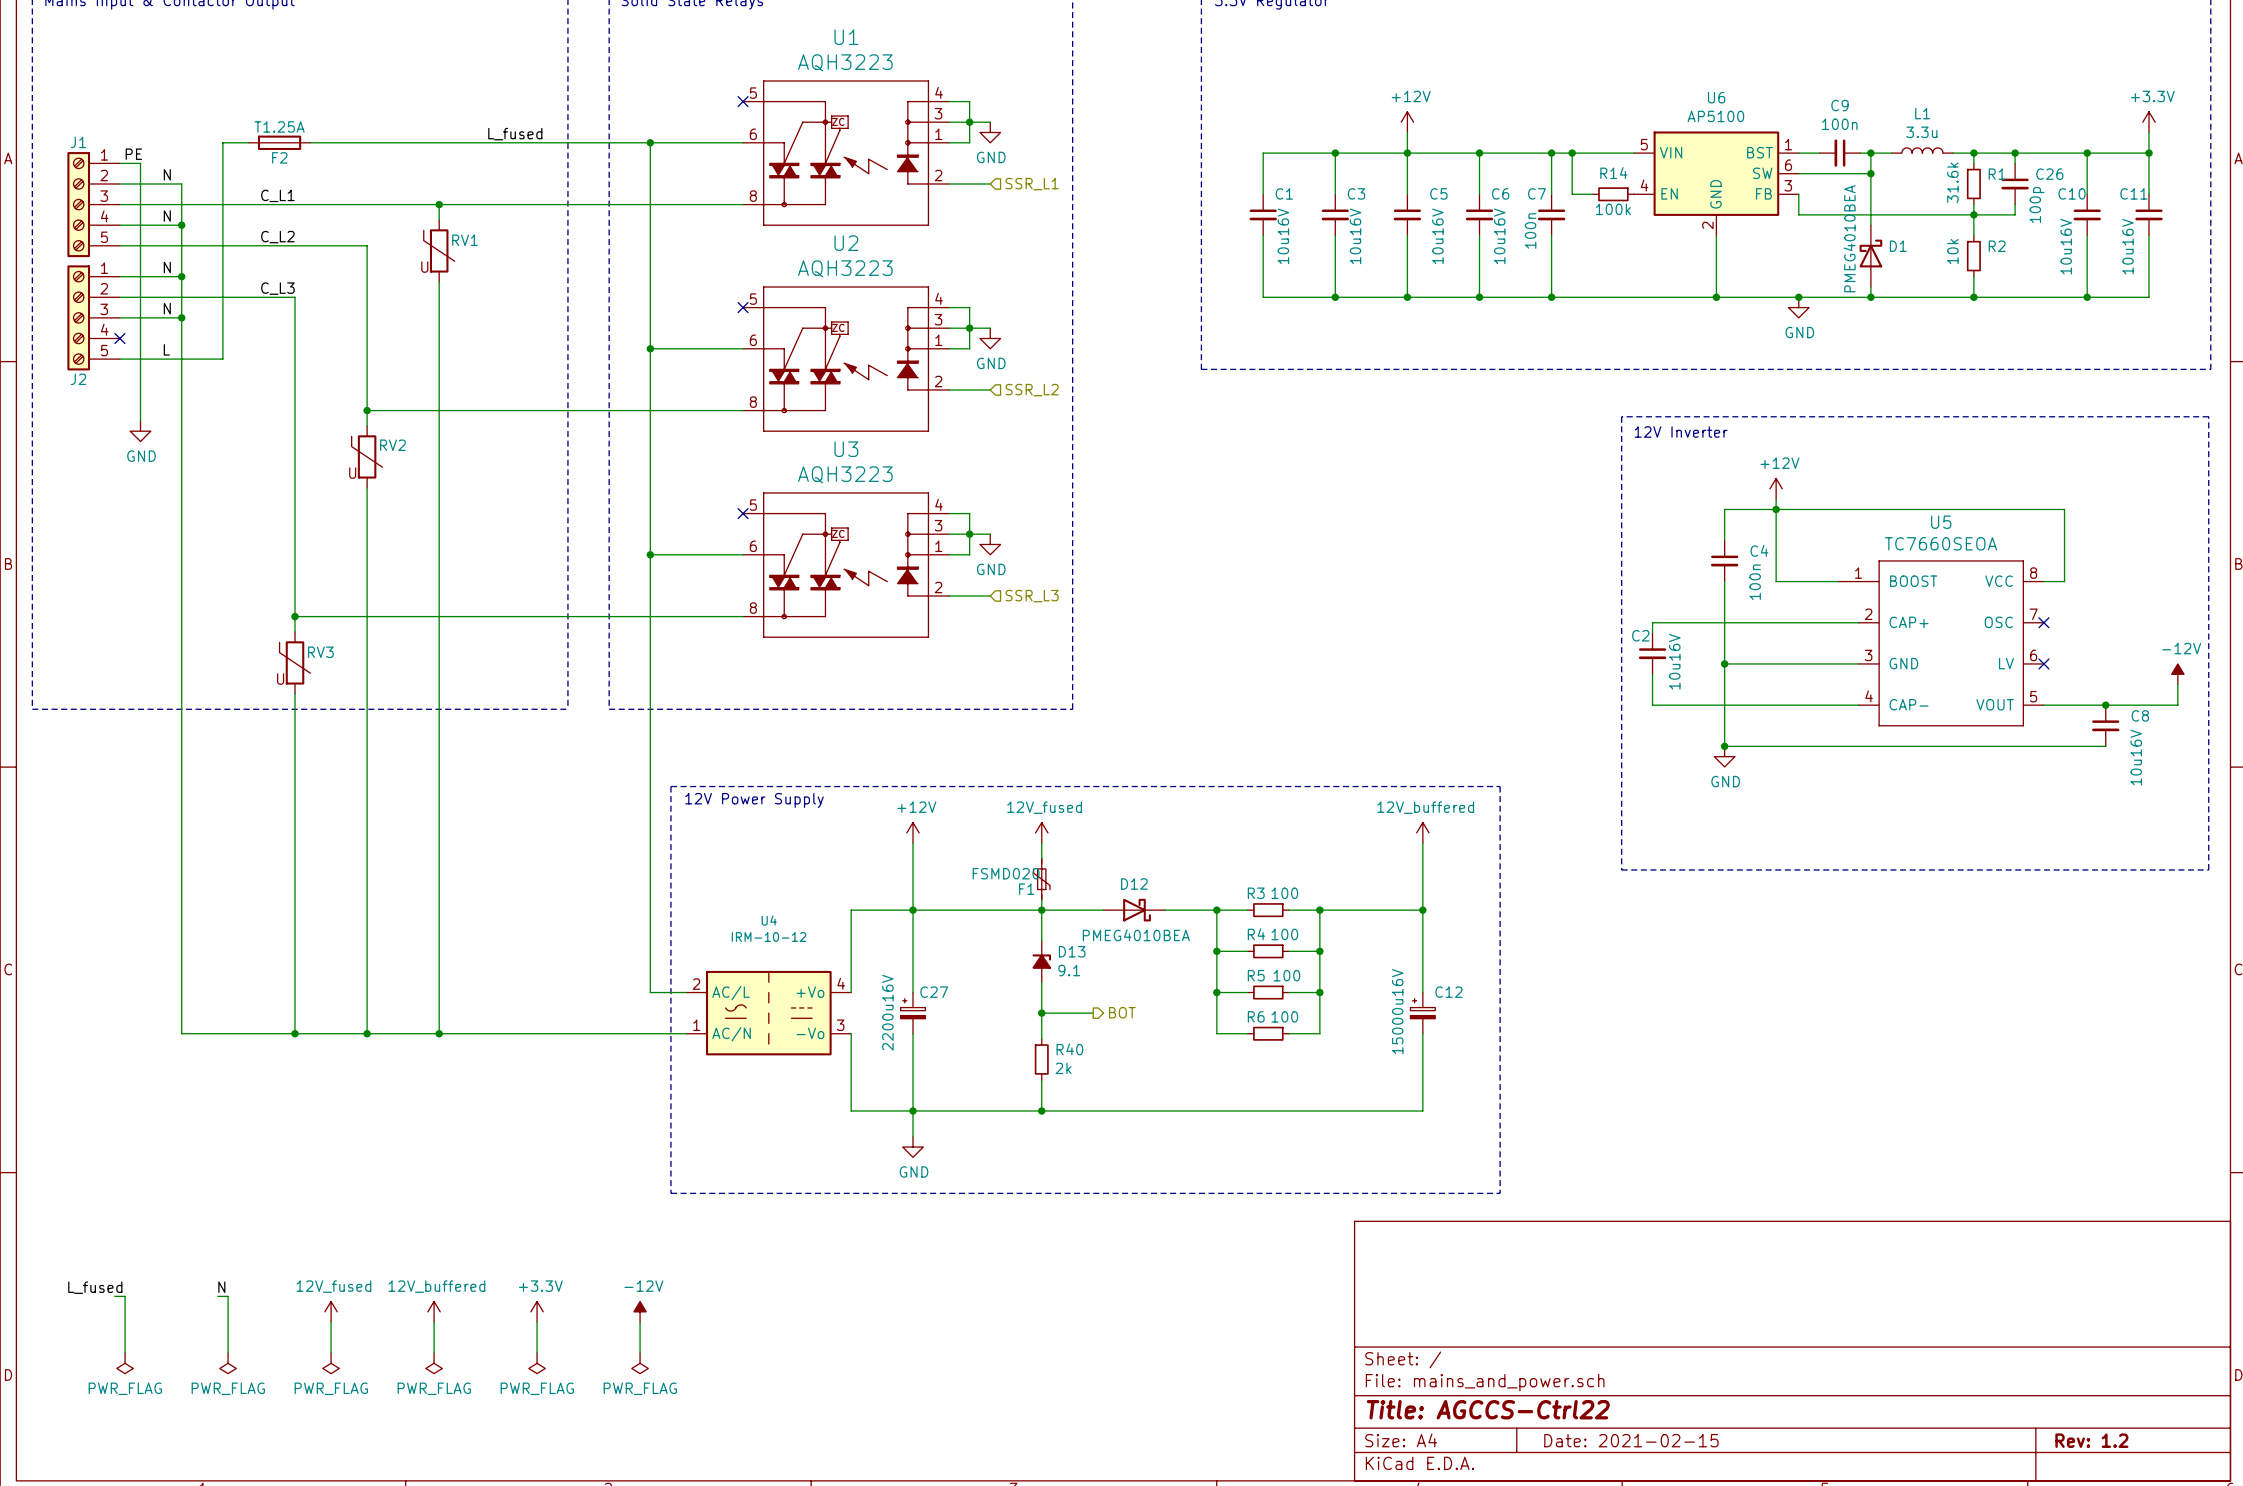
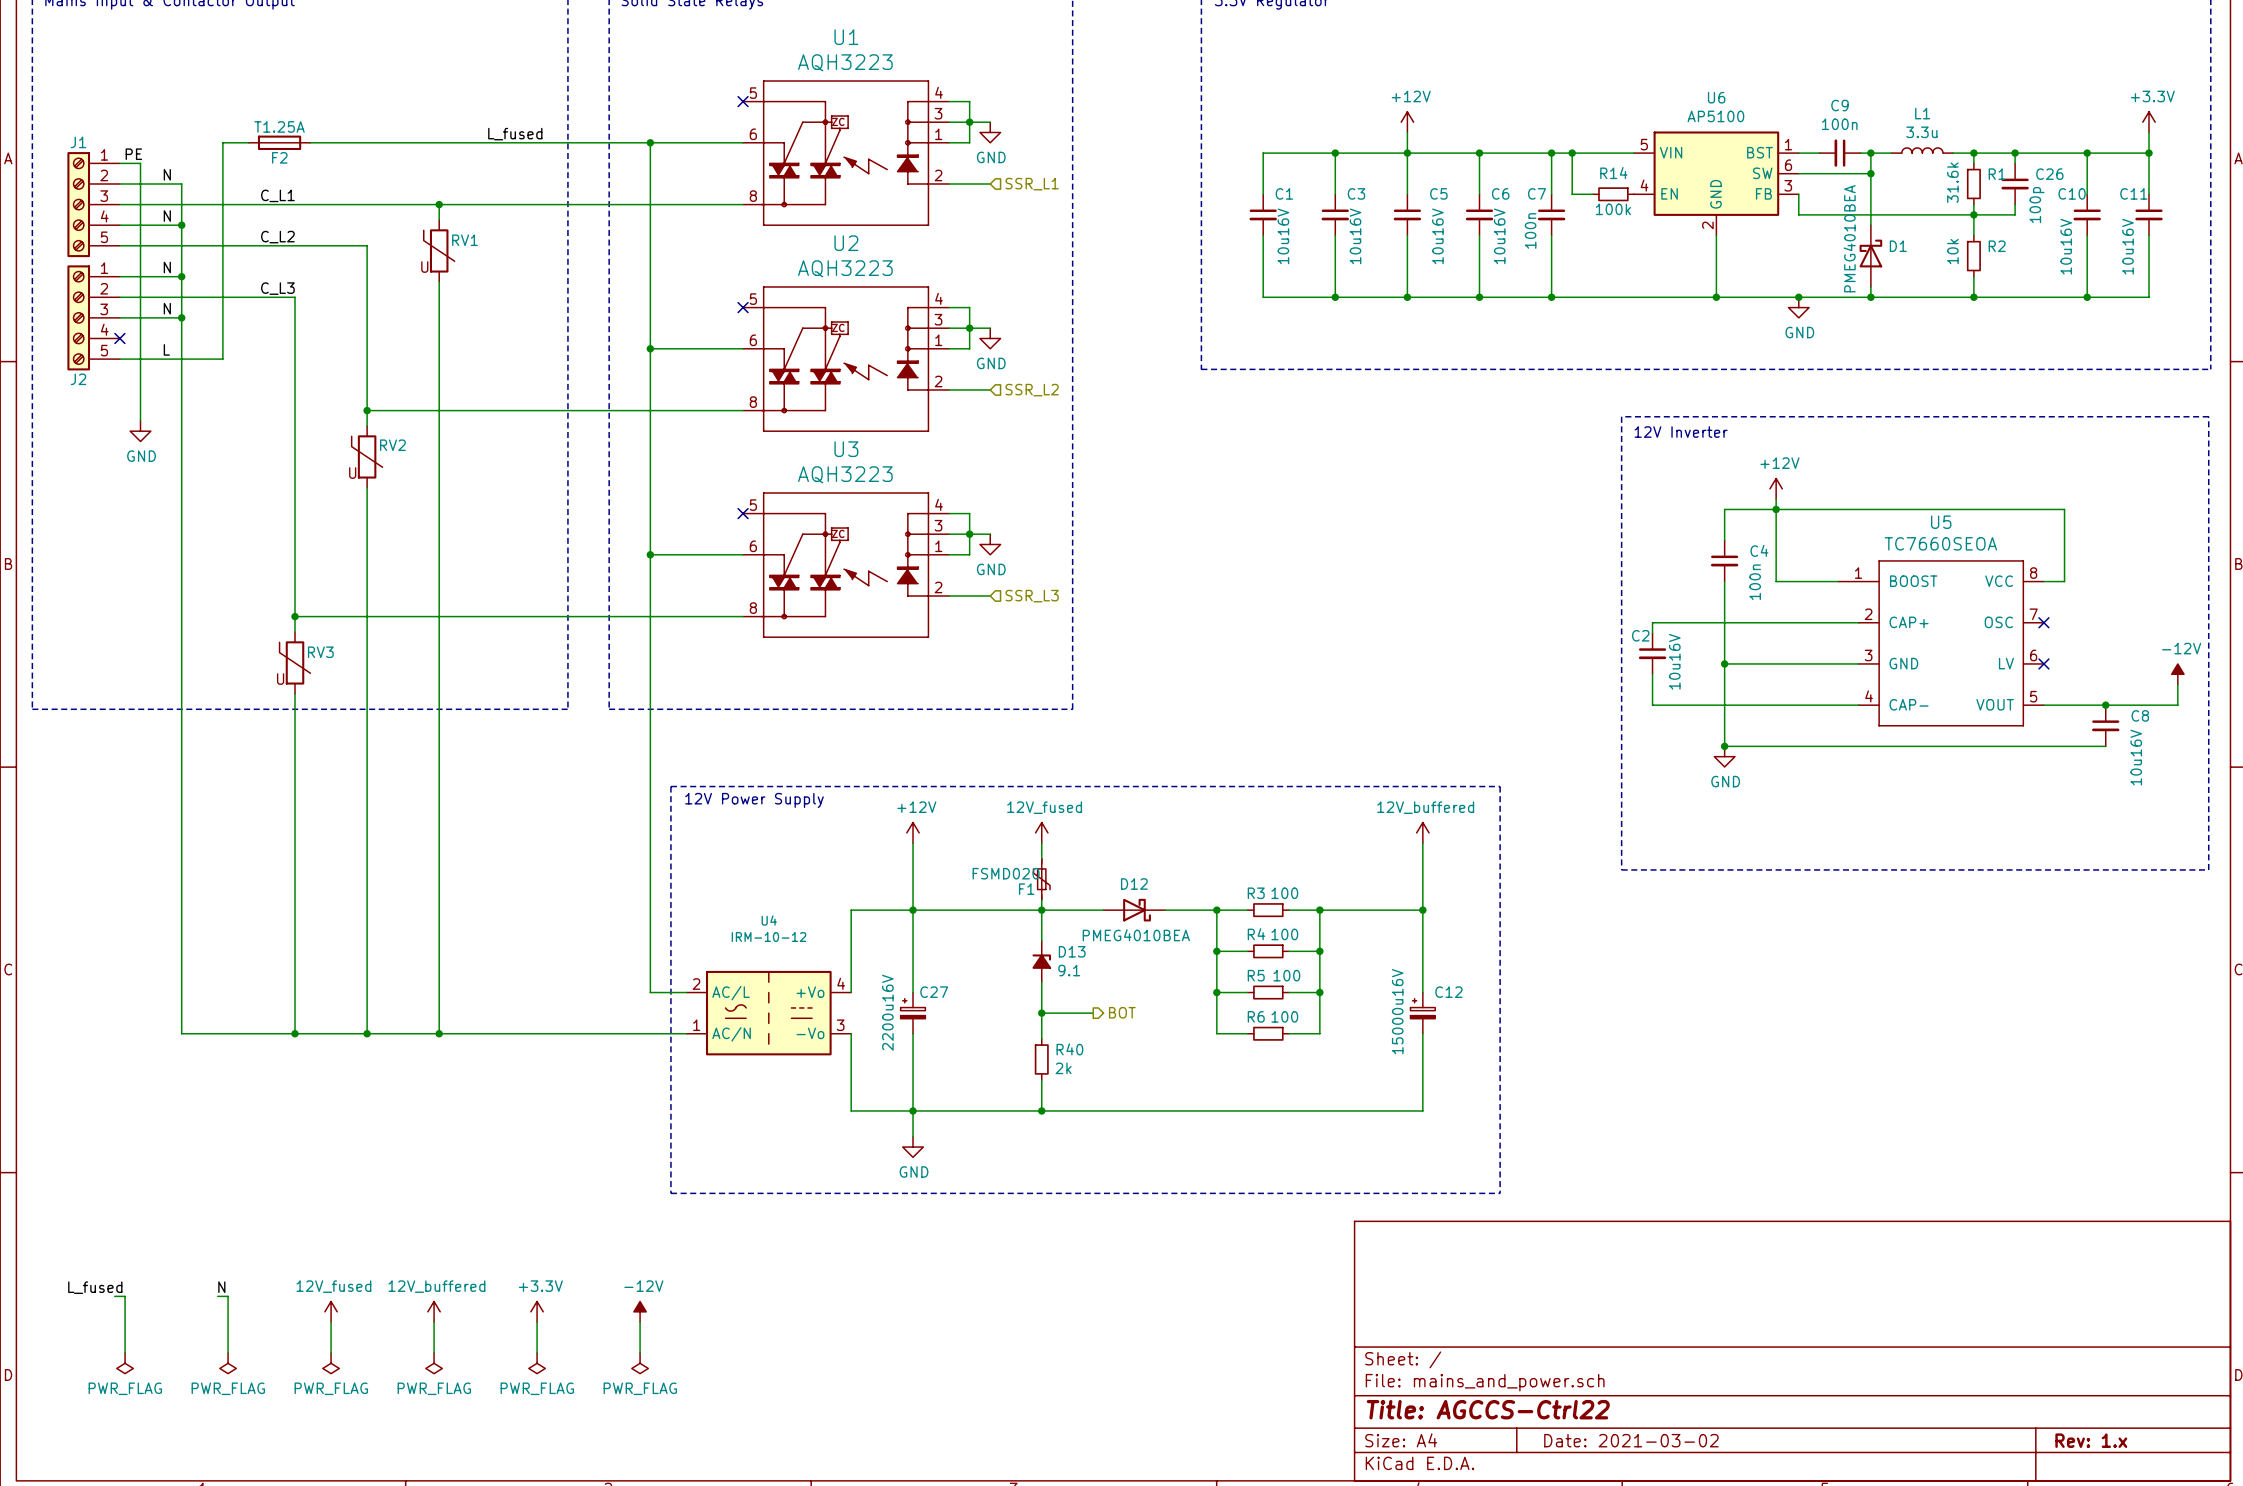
title block: Date: 2021-02-15 (1631, 1440) -> Date: 2021-03-02 (1631, 1440)
title block: Rev: 1.2 (2091, 1440) -> Rev: 1.x (2091, 1440)

